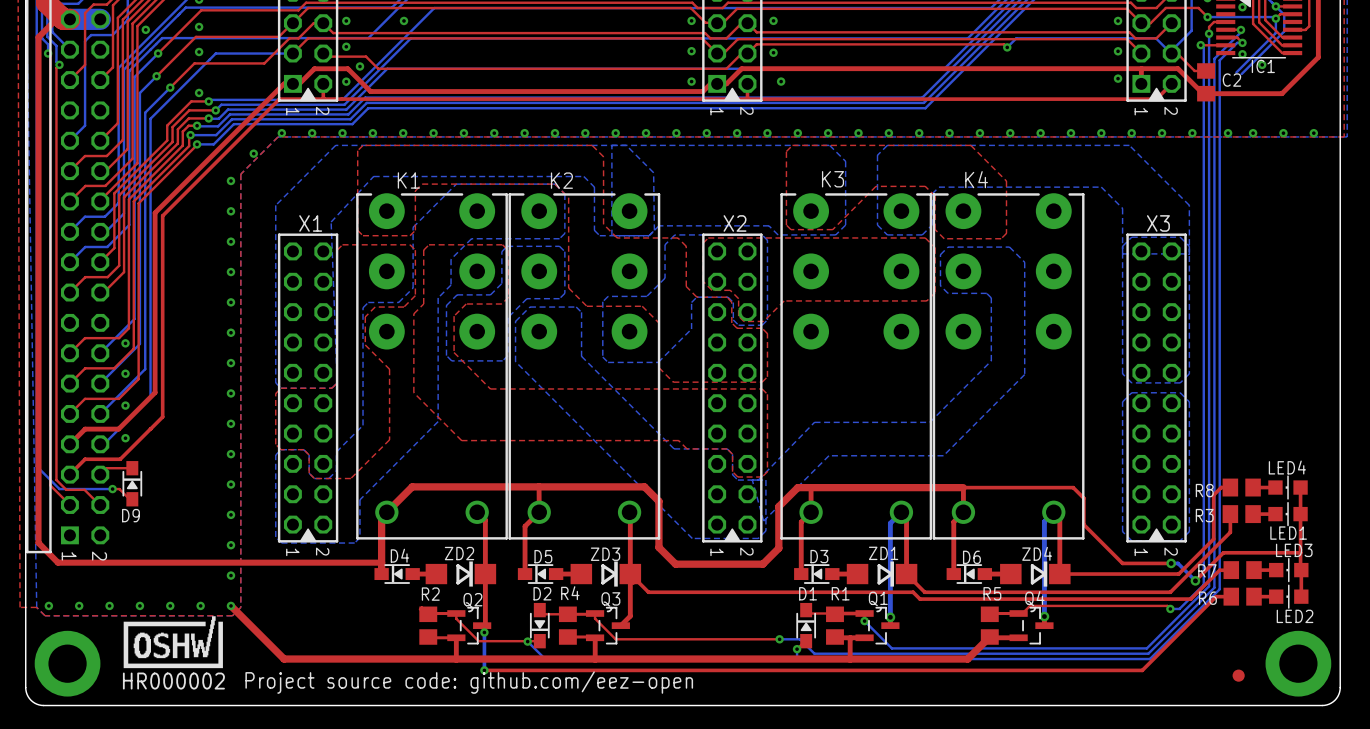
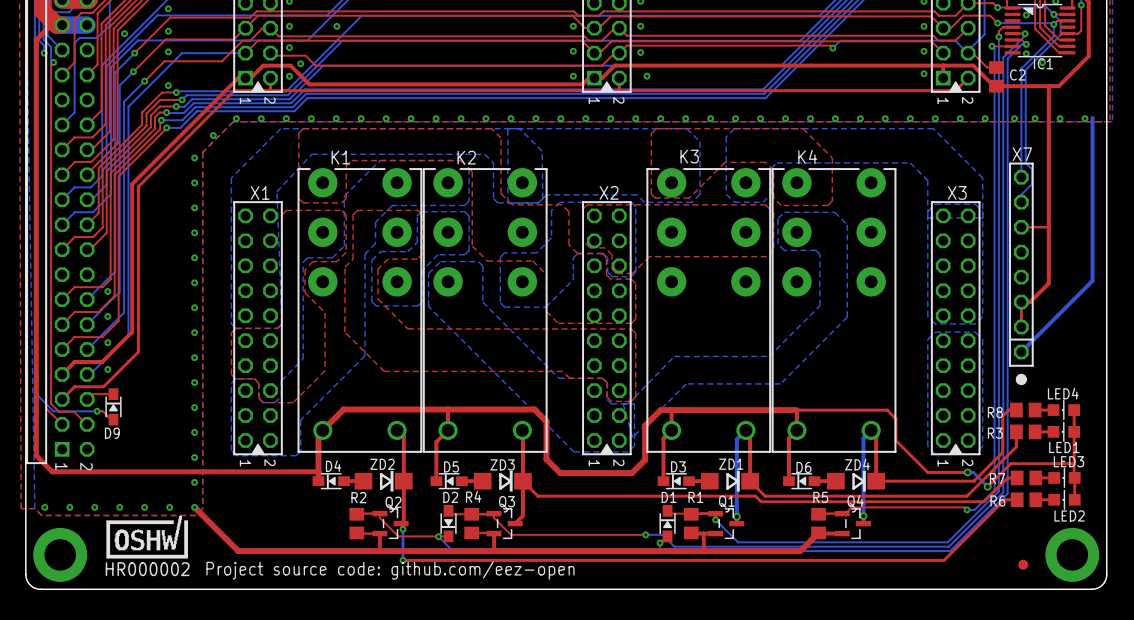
bottom track: none -> (1021, 68) (1021, 177)
bottom track: none -> (1025, 69) (1025, 162) (1031, 169) (1031, 184) (1021, 194) (1021, 202)
top track: none -> (1050, 86) (1048, 283) (1030, 302) (1021, 302) (1021, 327)
bottom track: none -> (1092, 118) (1092, 280) (1021, 352)
top track: none -> (1021, 227) (1048, 228)
X7: none -> (1021, 273)

